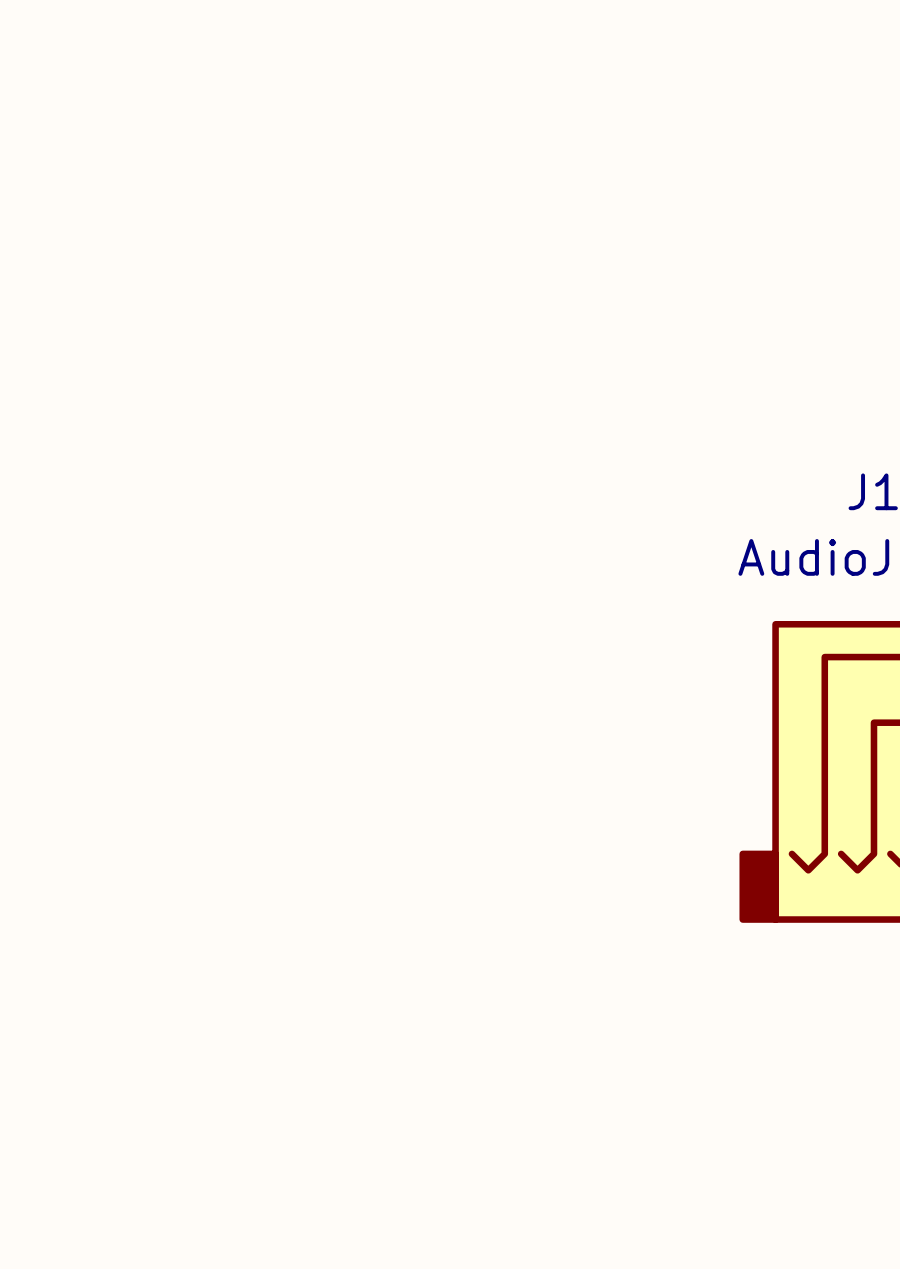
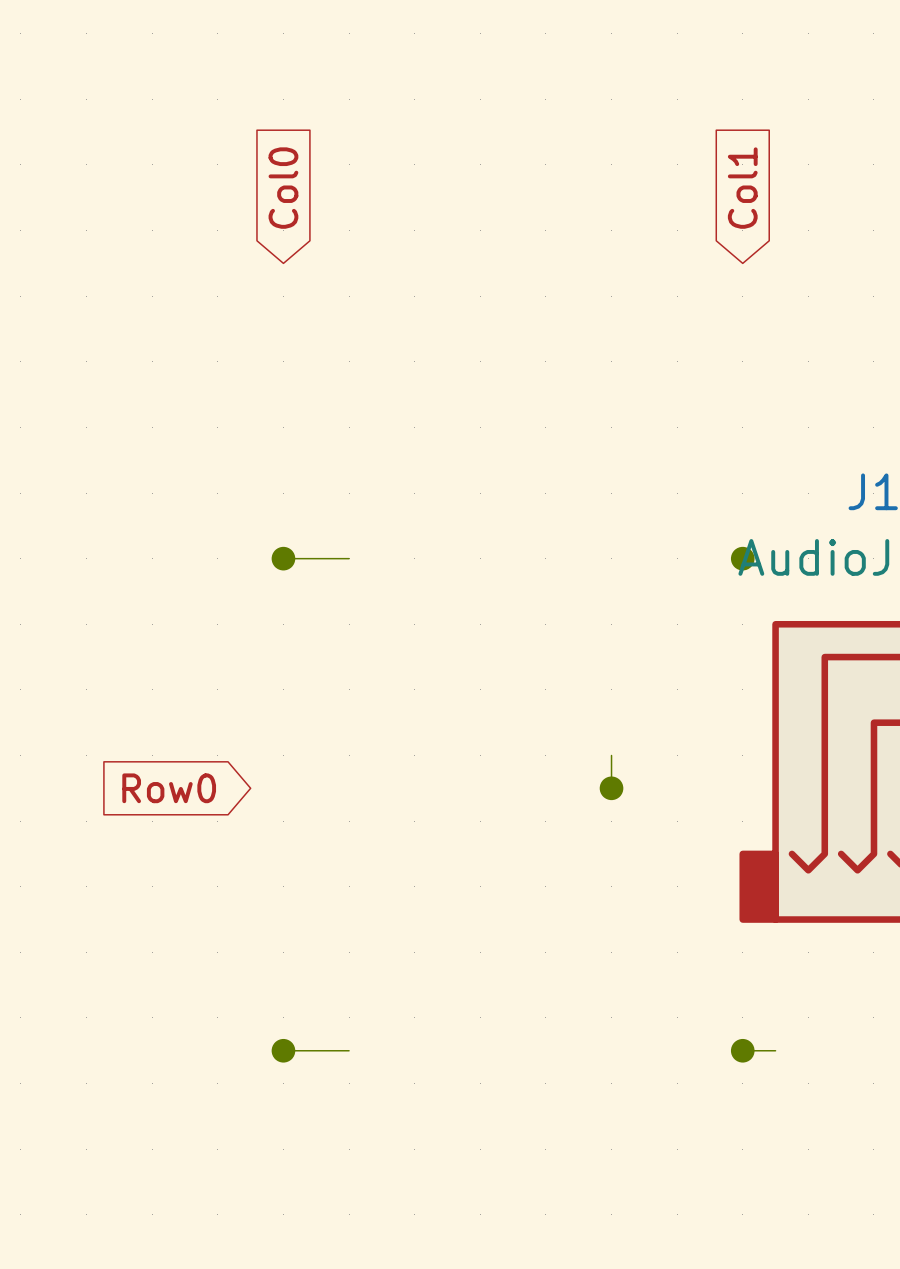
global label: none -> Col0 (283, 188)
global label: none -> Col1 (742, 188)
wire: none -> (283, 558) (349, 558)
junction: none -> (283, 558)
junction: none -> (742, 558)
wire: none -> (611, 755) (611, 788)
global label: none -> Row0 (169, 788)
junction: none -> (611, 788)
wire: none -> (283, 1050) (349, 1050)
junction: none -> (283, 1050)
wire: none -> (742, 1050) (775, 1050)
junction: none -> (742, 1050)

